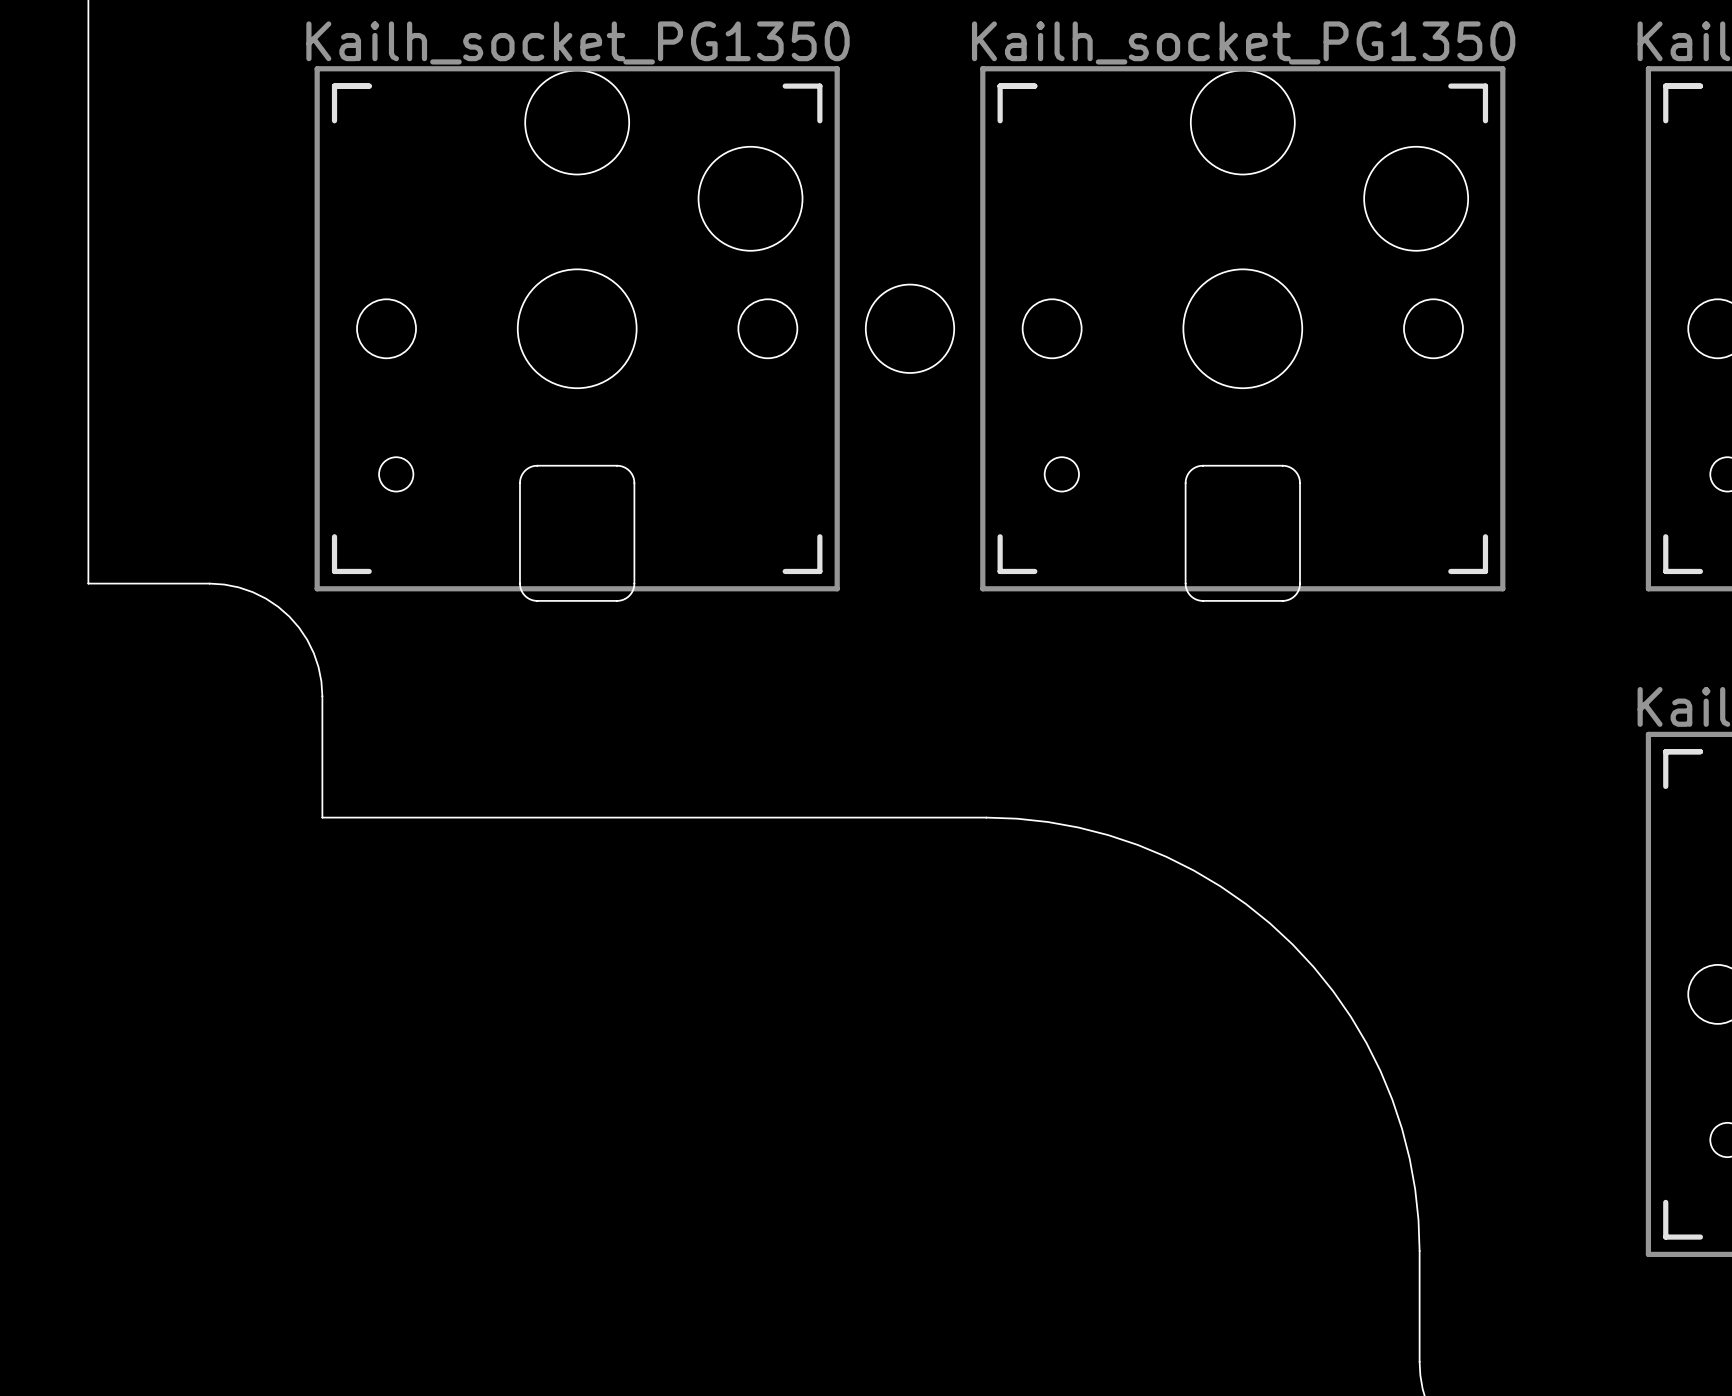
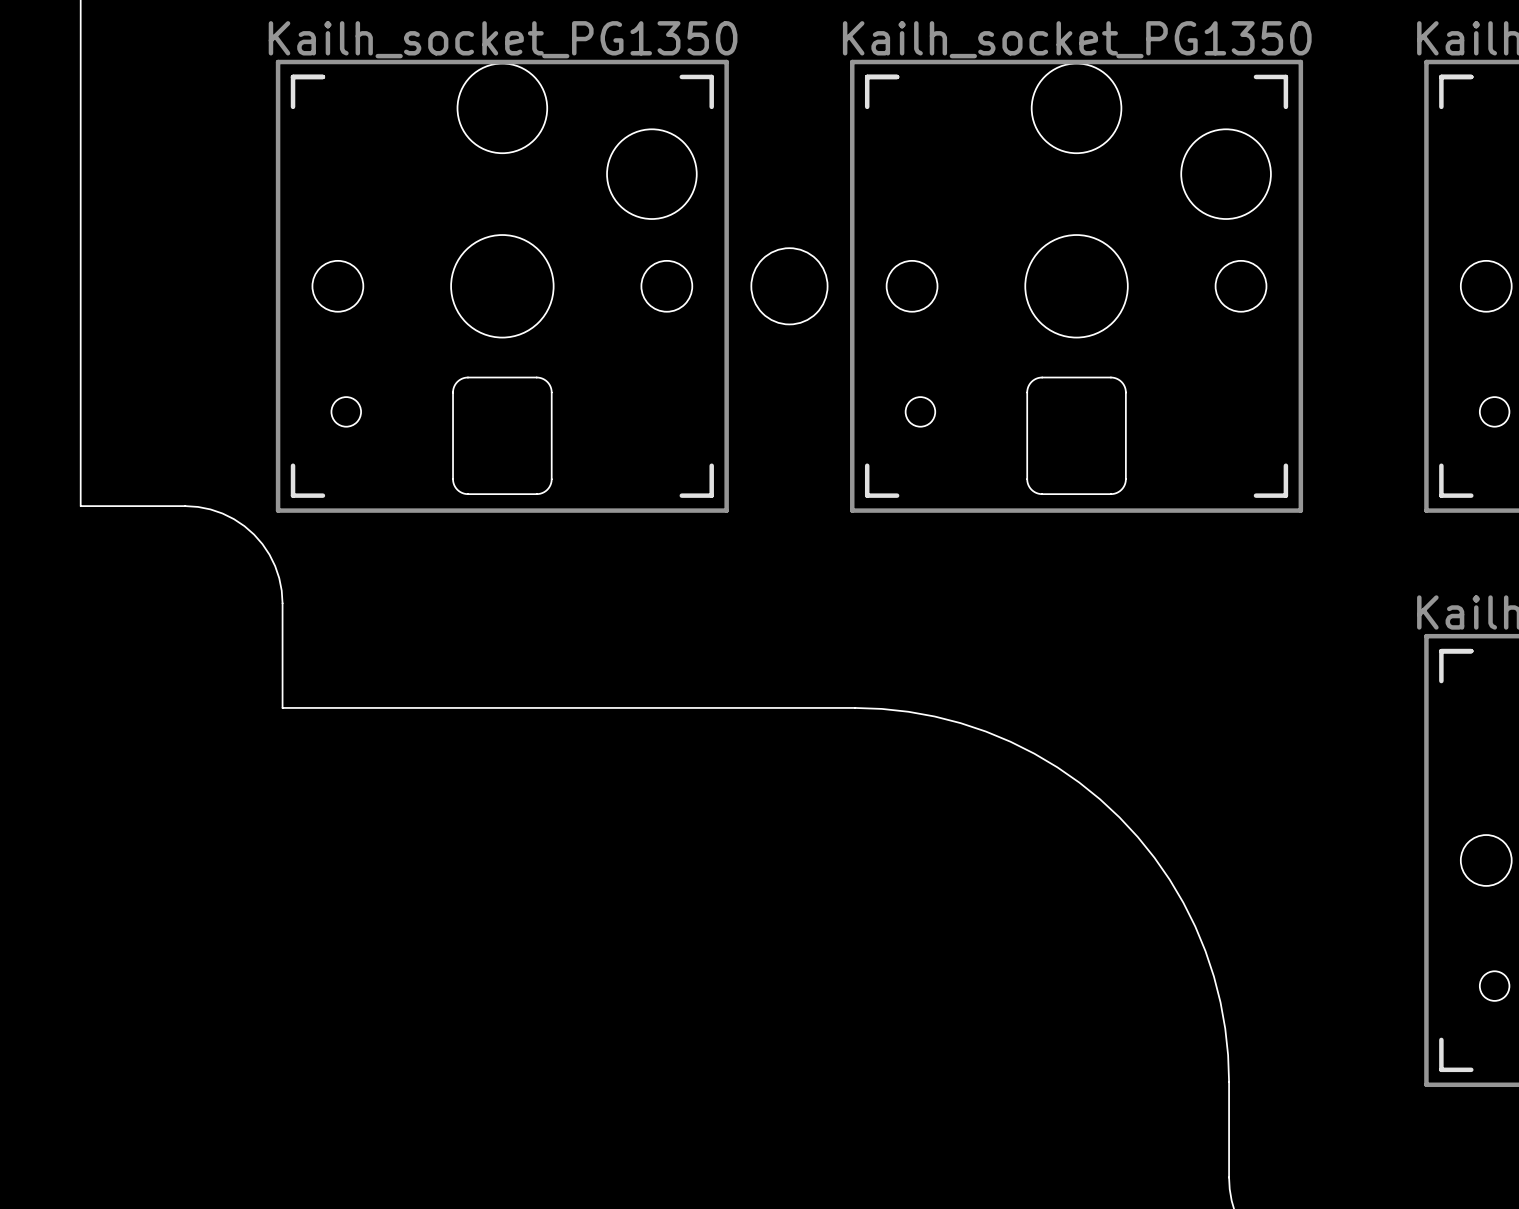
part position: (577, 533) -> (502, 435)
part position: (1242, 533) -> (1076, 435)

